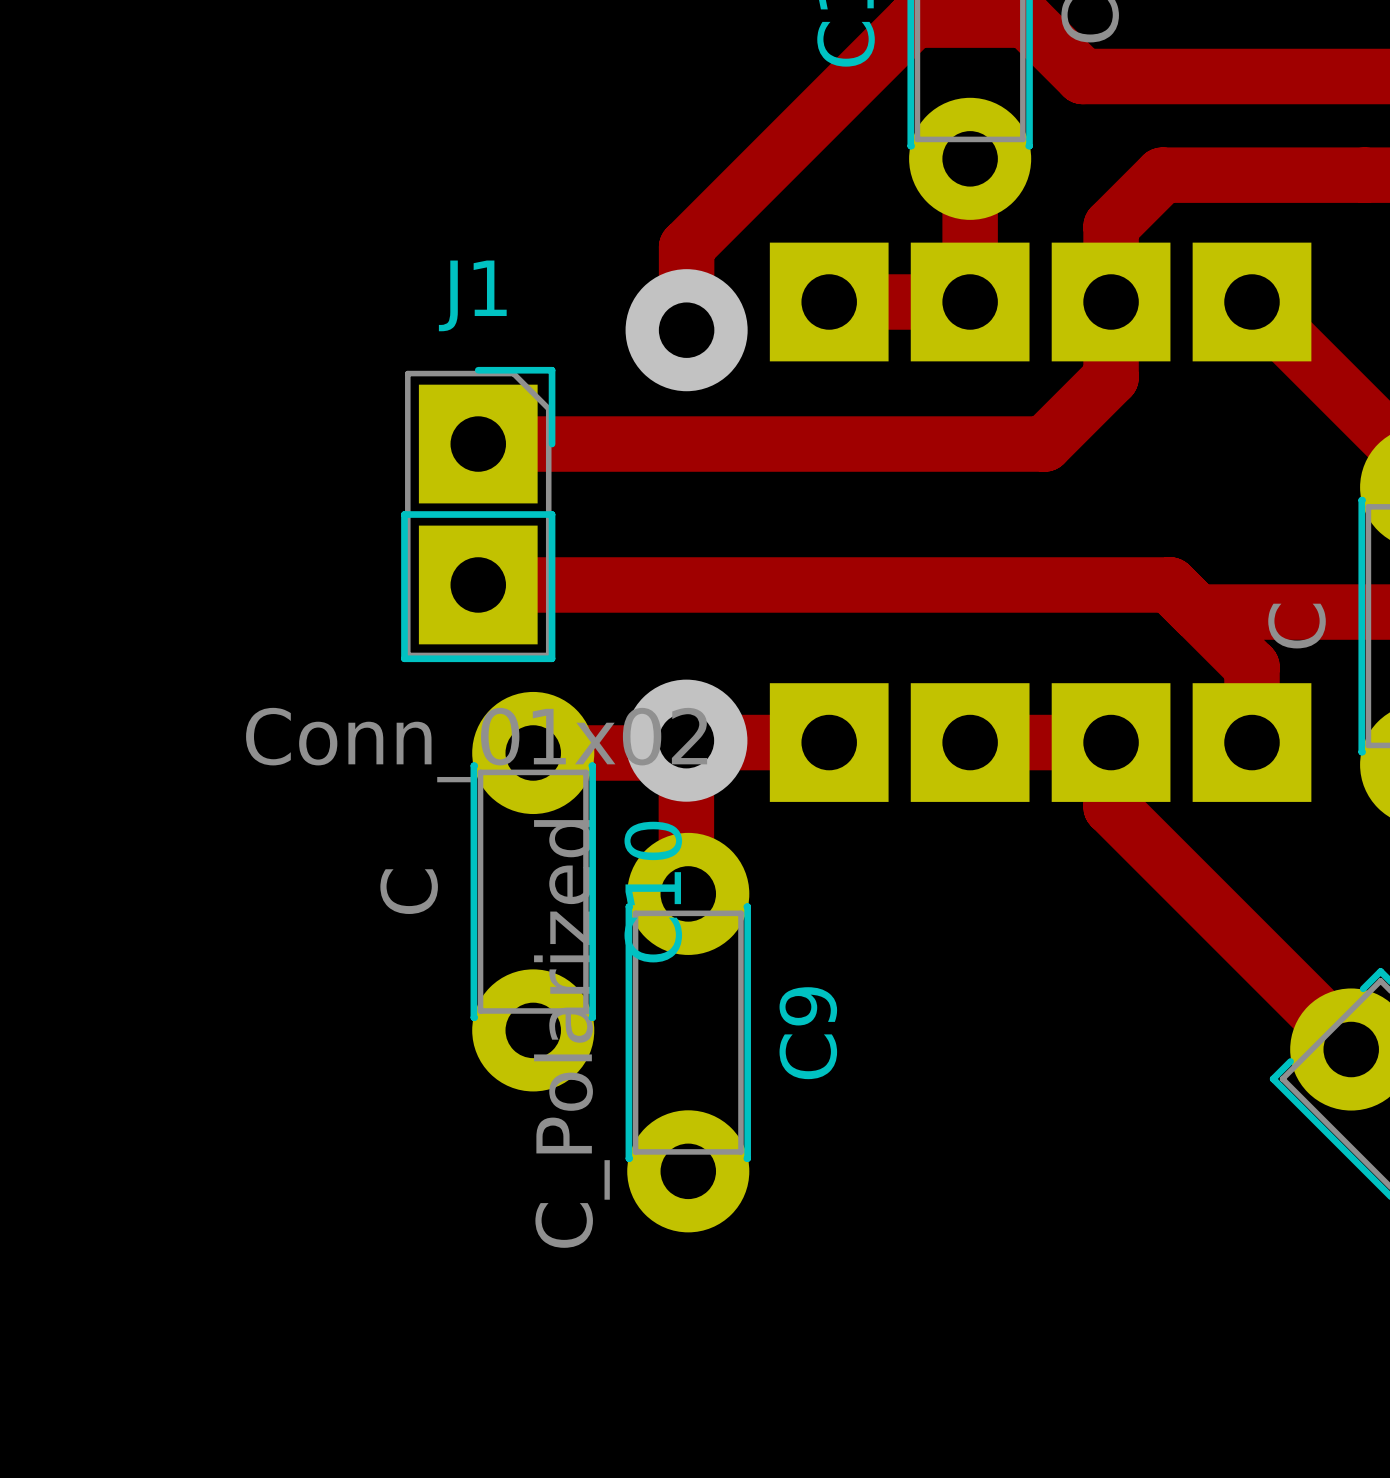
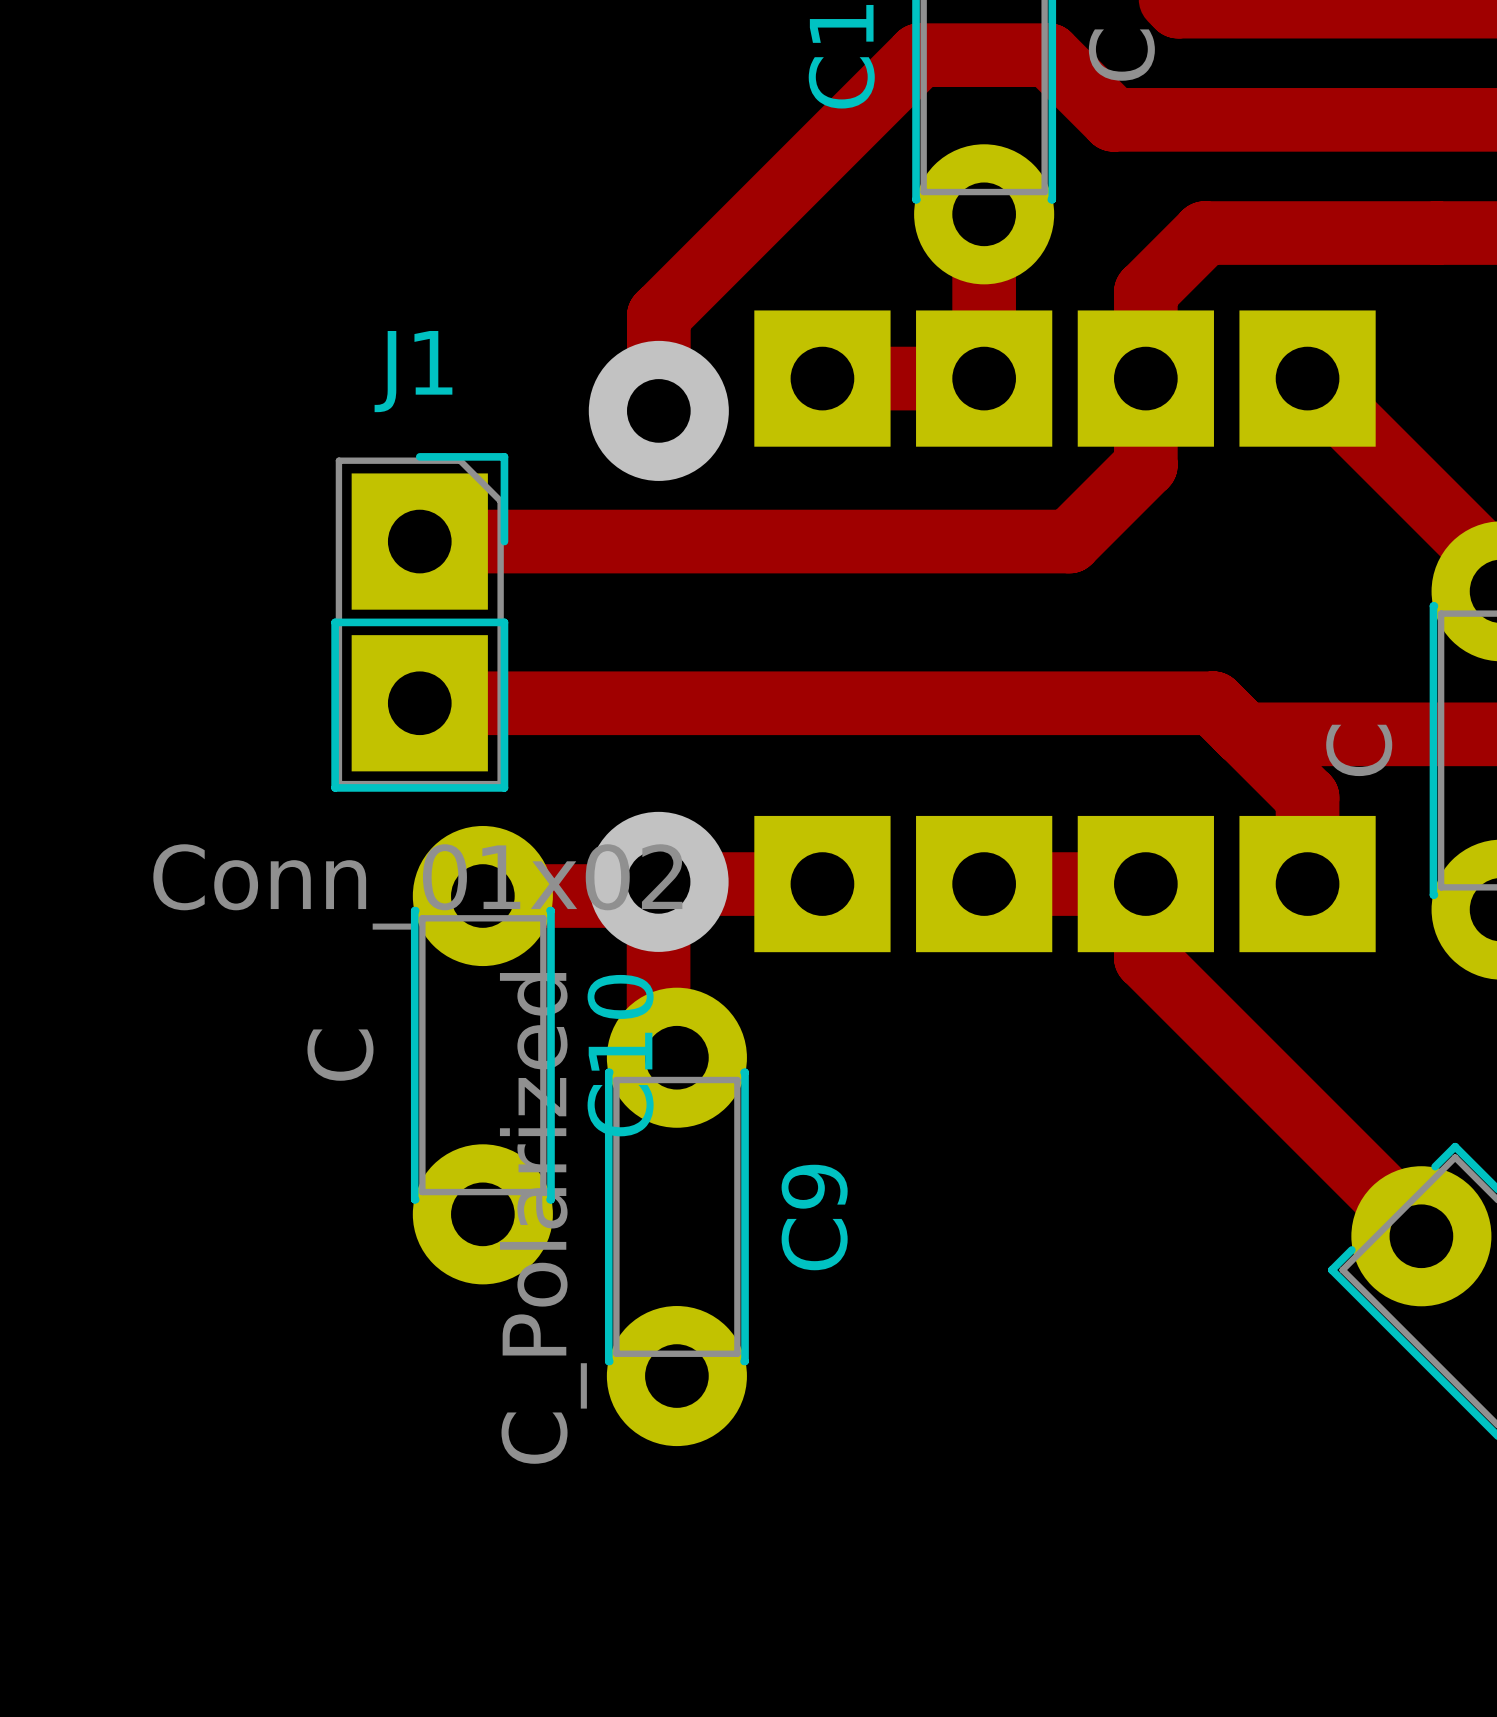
C9 position: (688, 1032) -> (676, 1216)

